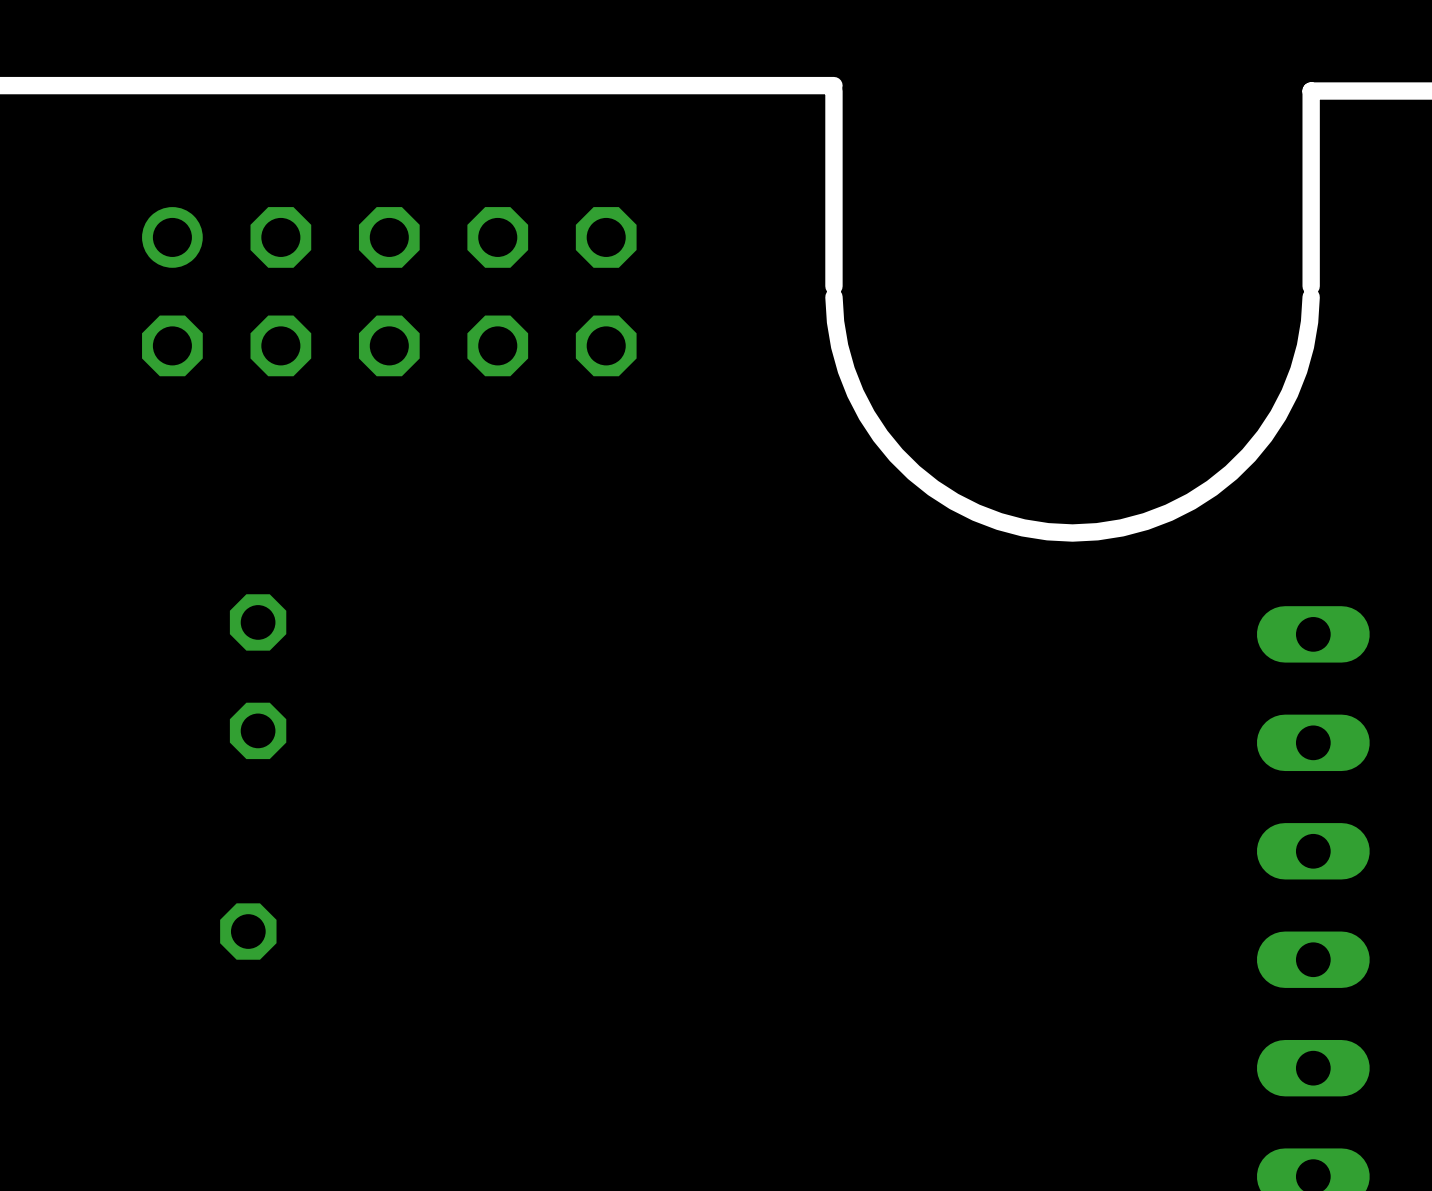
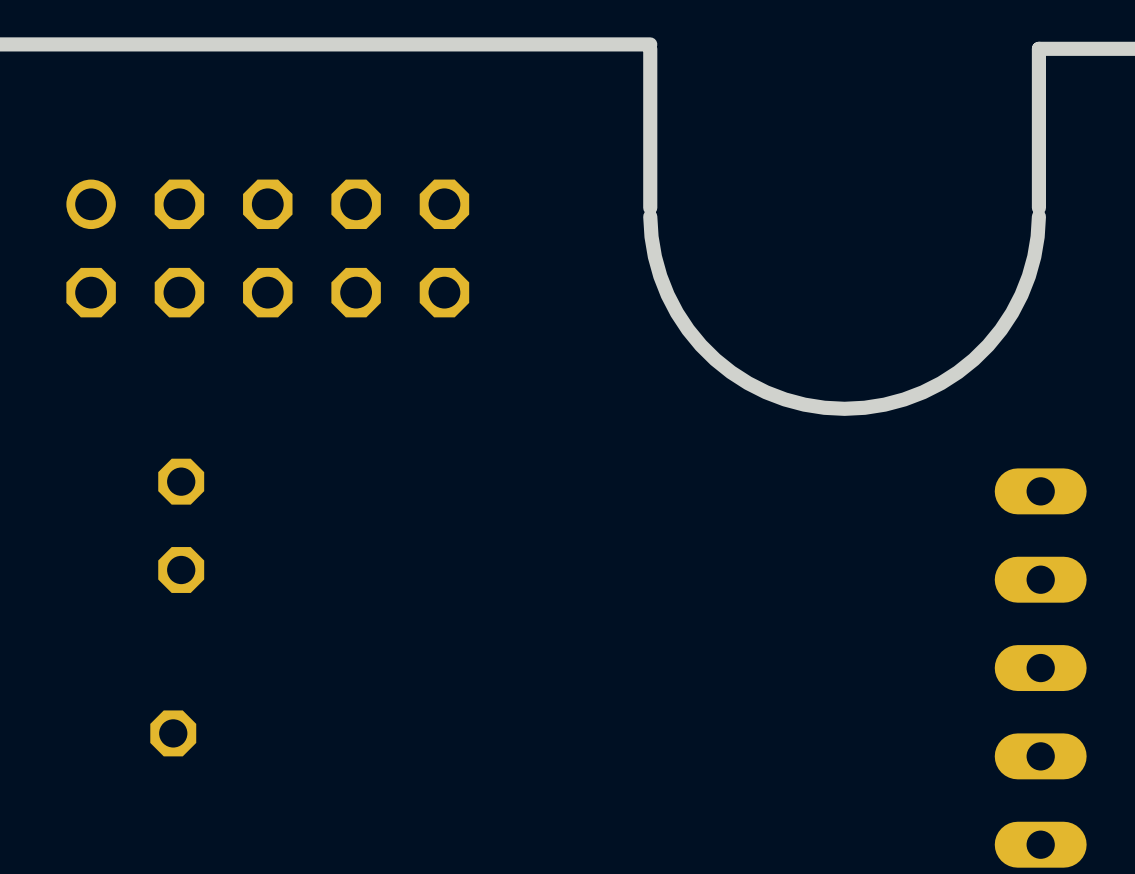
part position: (389, 291) -> (267, 248)

